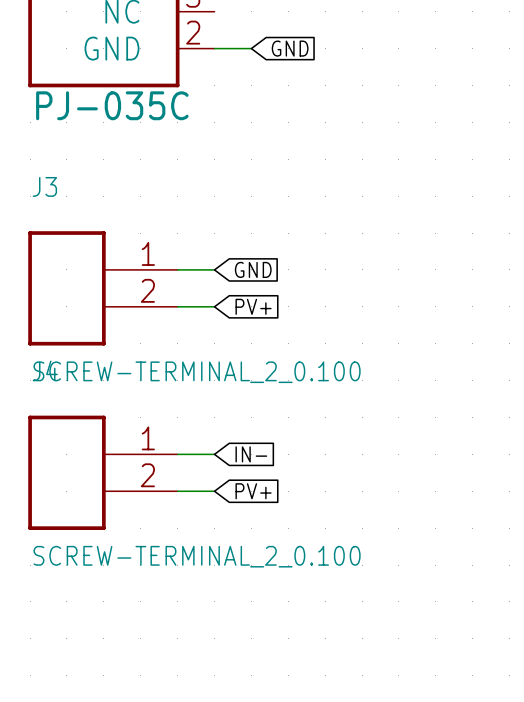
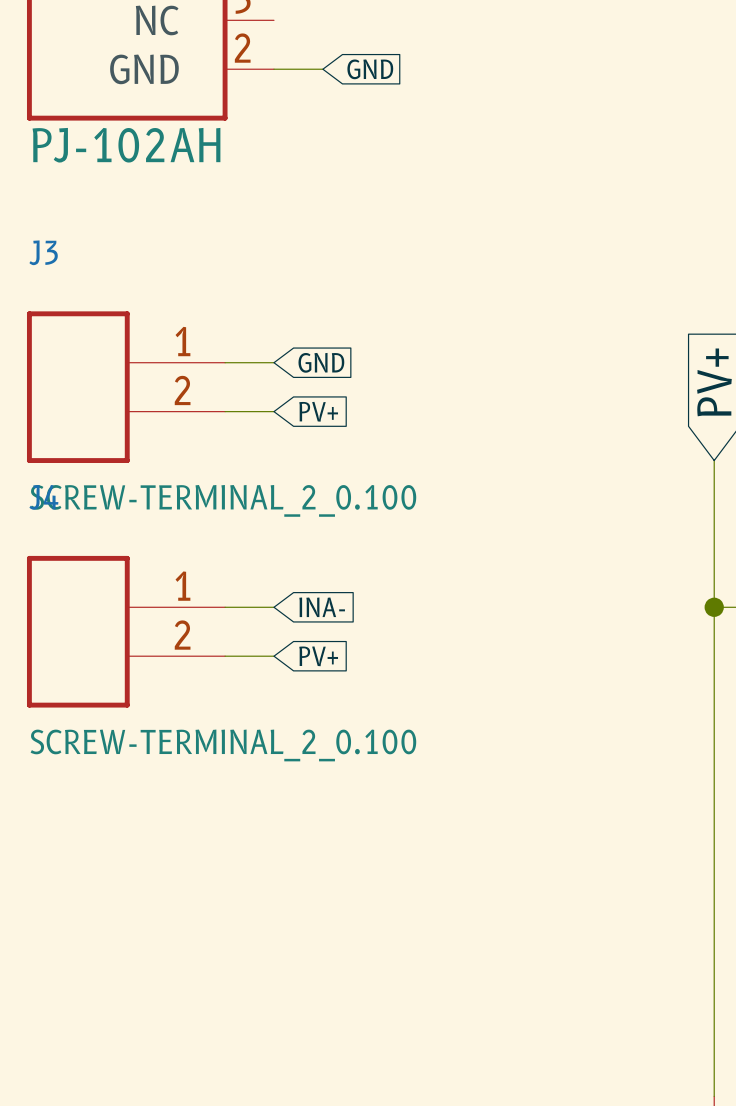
part value: PJ-035C (112, 105) -> PJ-102AH (126, 145)
global label: IN- (251, 454) -> INA- (322, 607)

